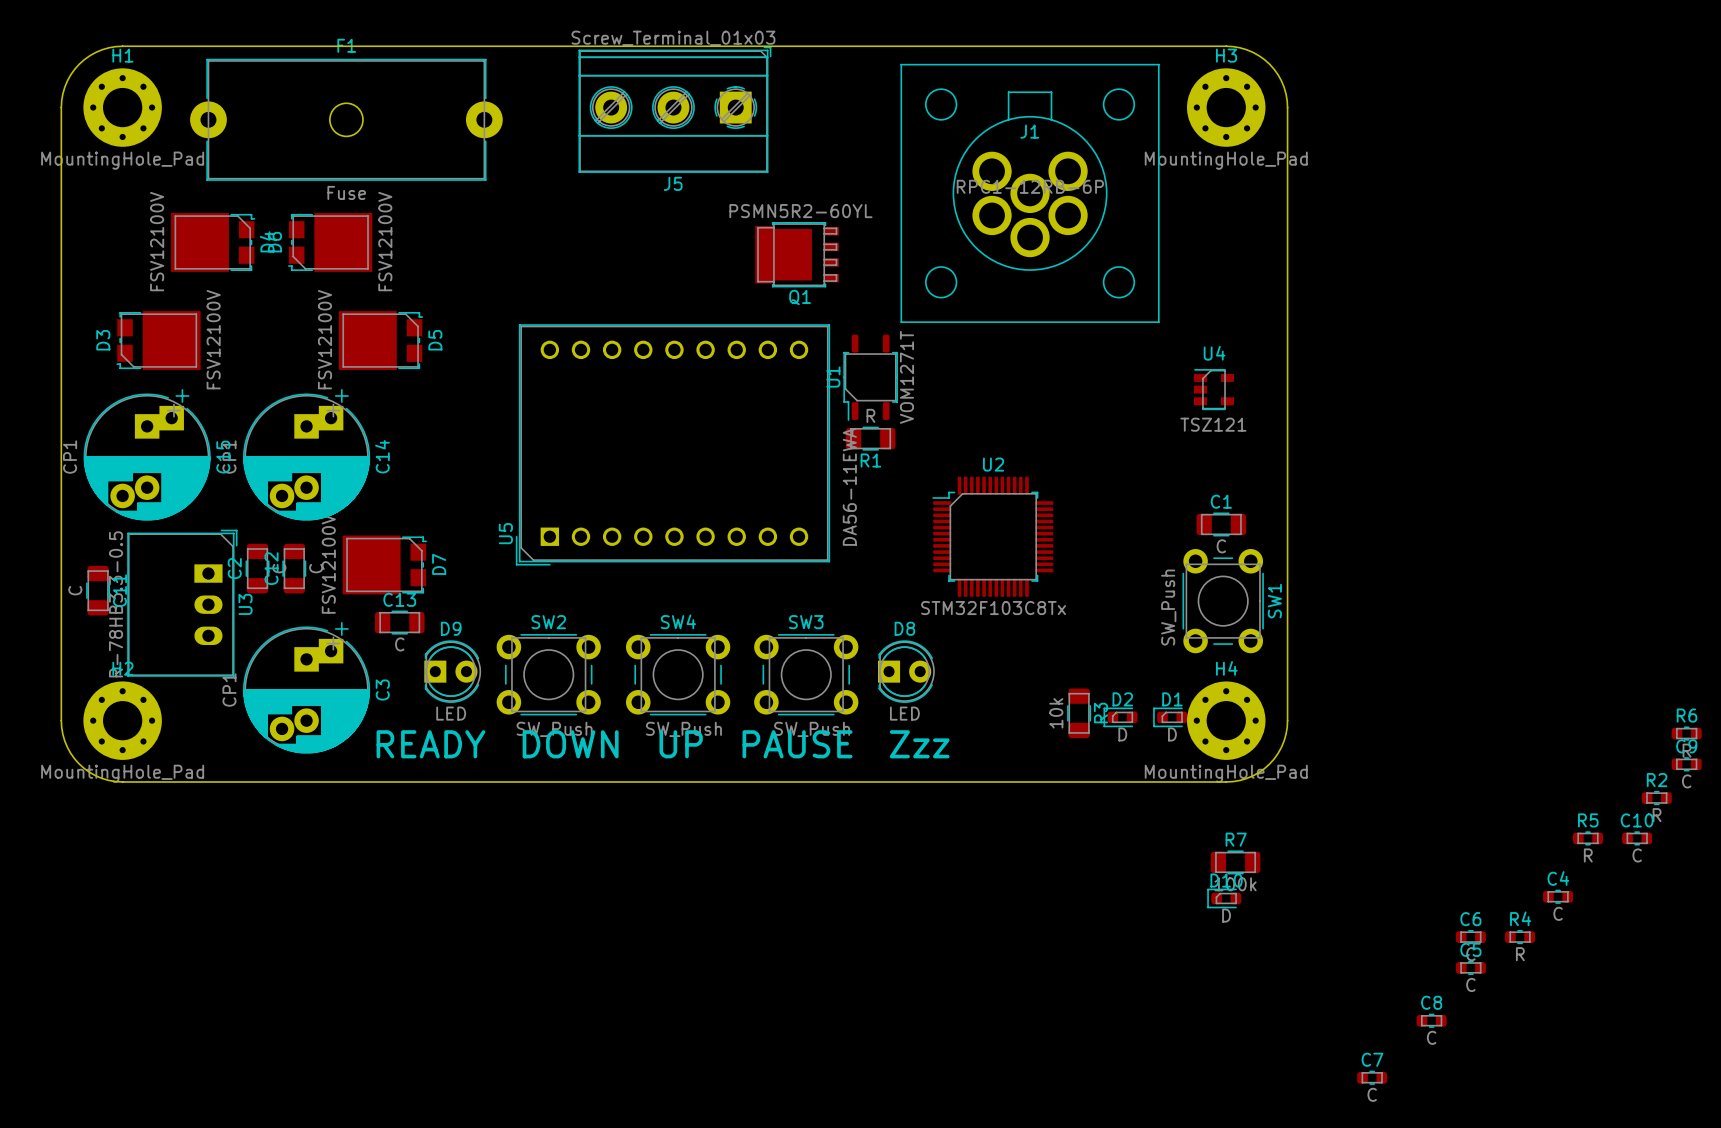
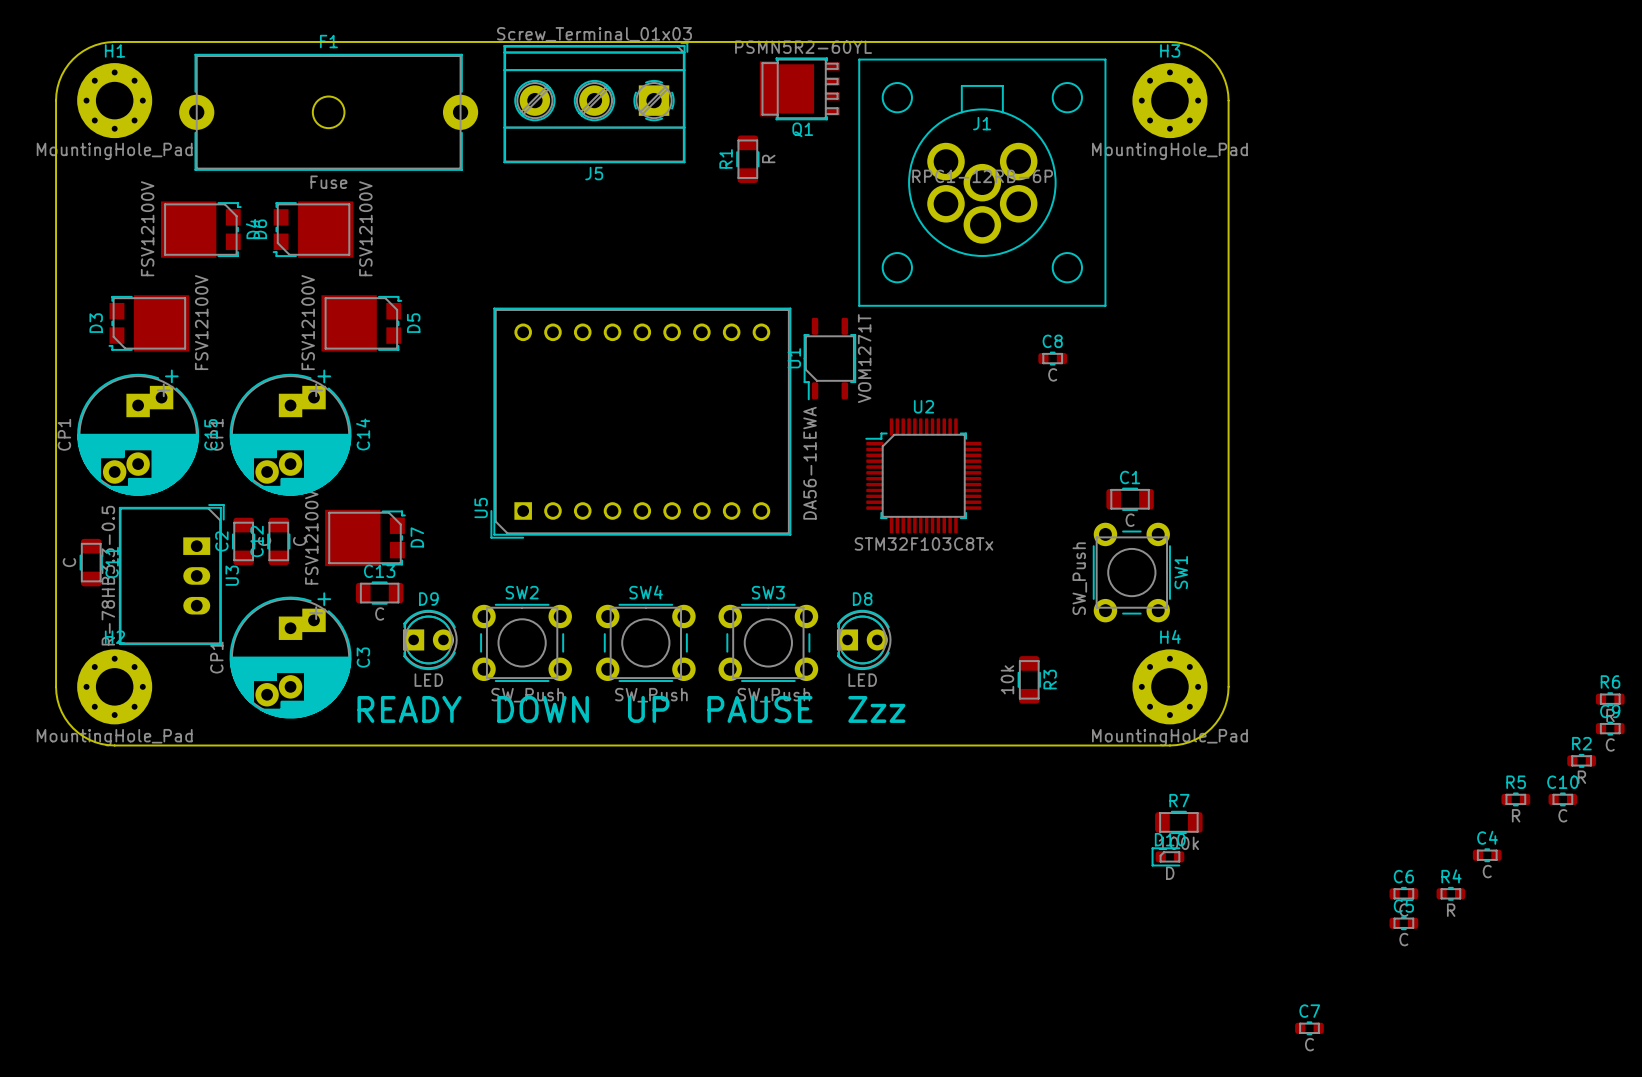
J5 position: (674, 109) -> (595, 102)
Q1 position: (797, 254) -> (799, 88)
U4: TSZ121 (1213, 389) -> none
R1 rotation: 0° (870, 438) -> 90° clockwise (747, 159)
R1 position: (870, 438) -> (747, 159)
C1 position: (1221, 524) -> (1130, 499)
U2 position: (992, 536) -> (923, 475)
SW1 position: (1223, 601) -> (1131, 572)
D2: D (1120, 717) -> none
D1: D (1170, 717) -> none
C8 position: (1431, 1020) -> (1052, 358)

